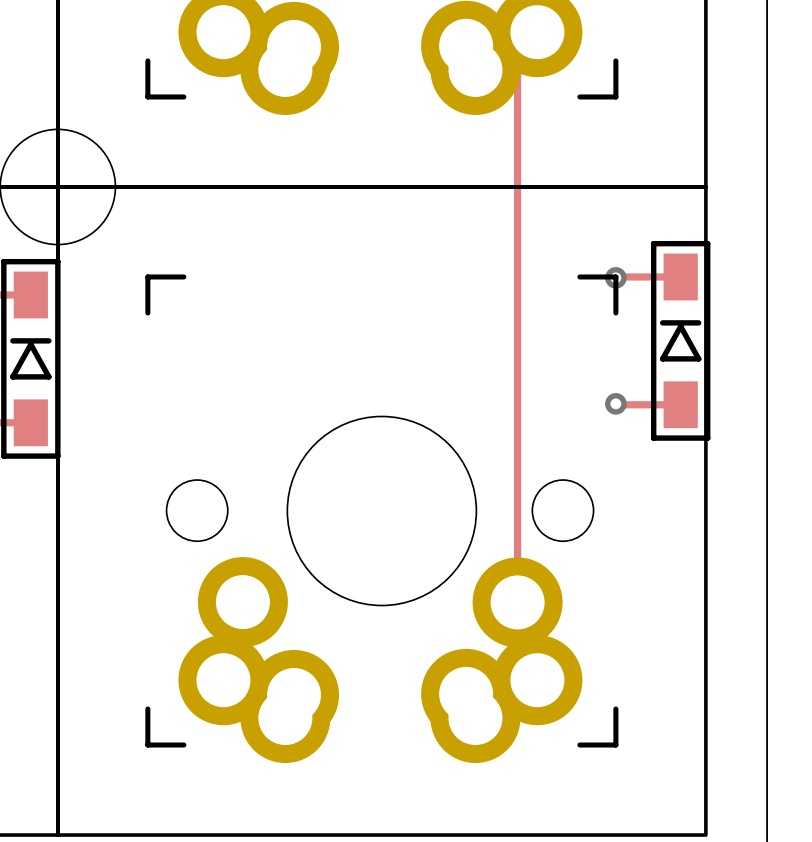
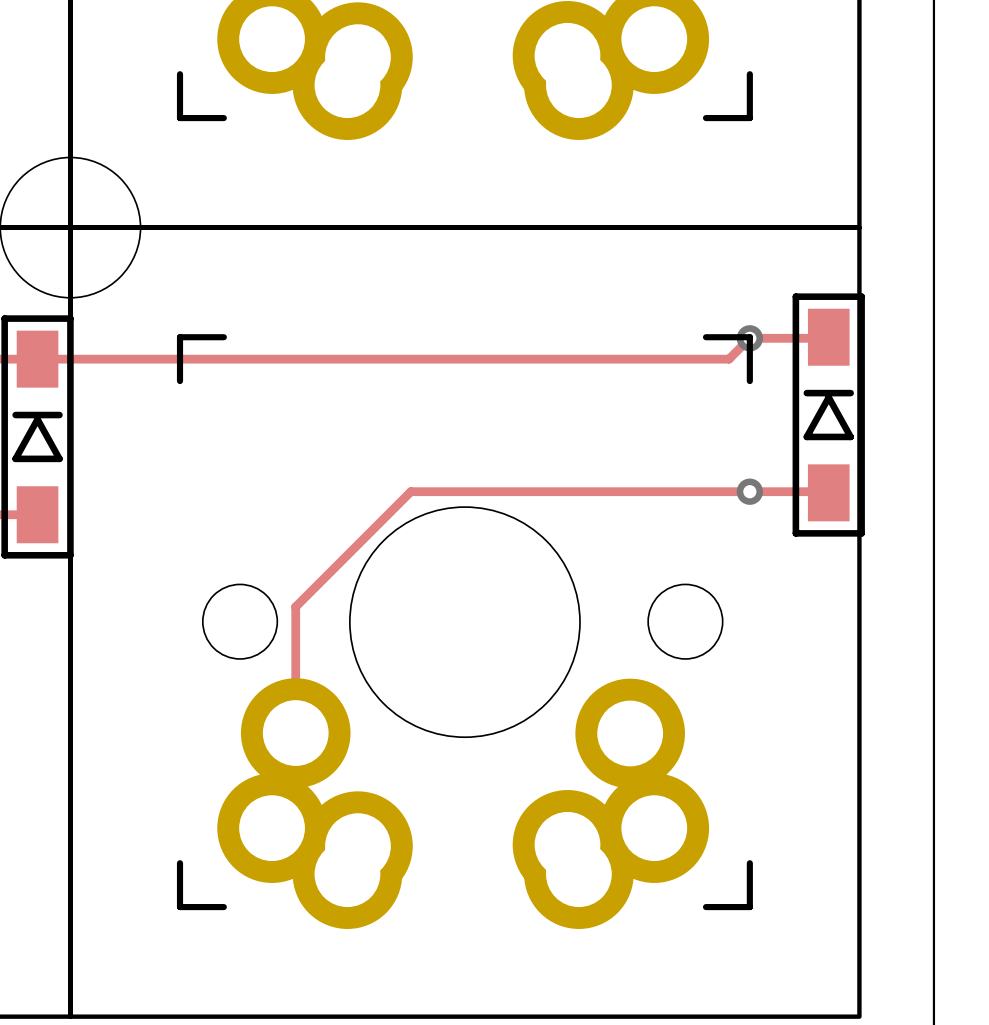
track: (537, 32) (517, 51) (517, 602) -> none
track: (680, 276) (615, 277) -> (828, 337) (749, 338) (729, 359) (37, 359)
track: (615, 403) (680, 404) -> (295, 733) (295, 606) (410, 491) (828, 492)

